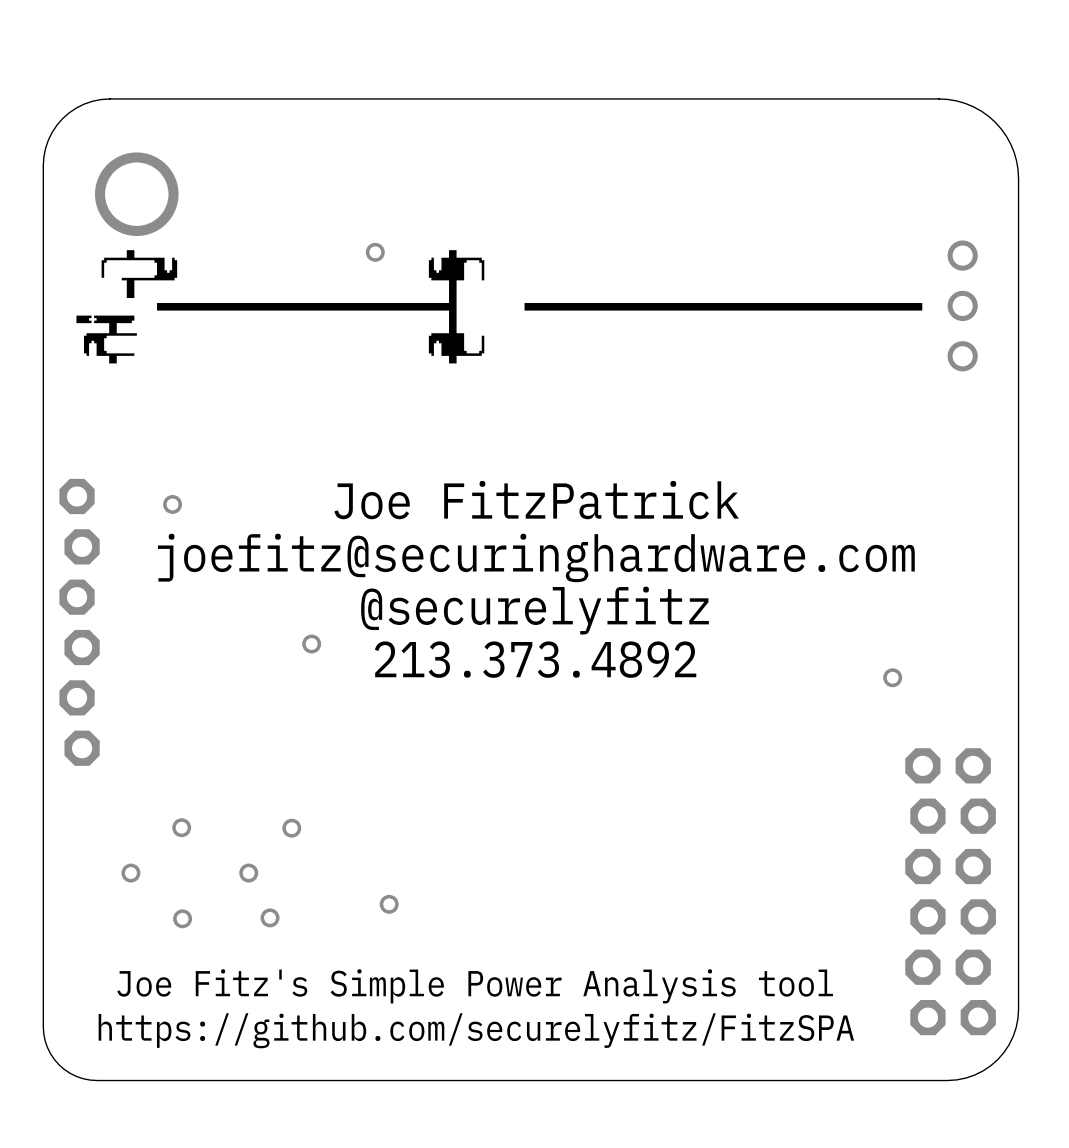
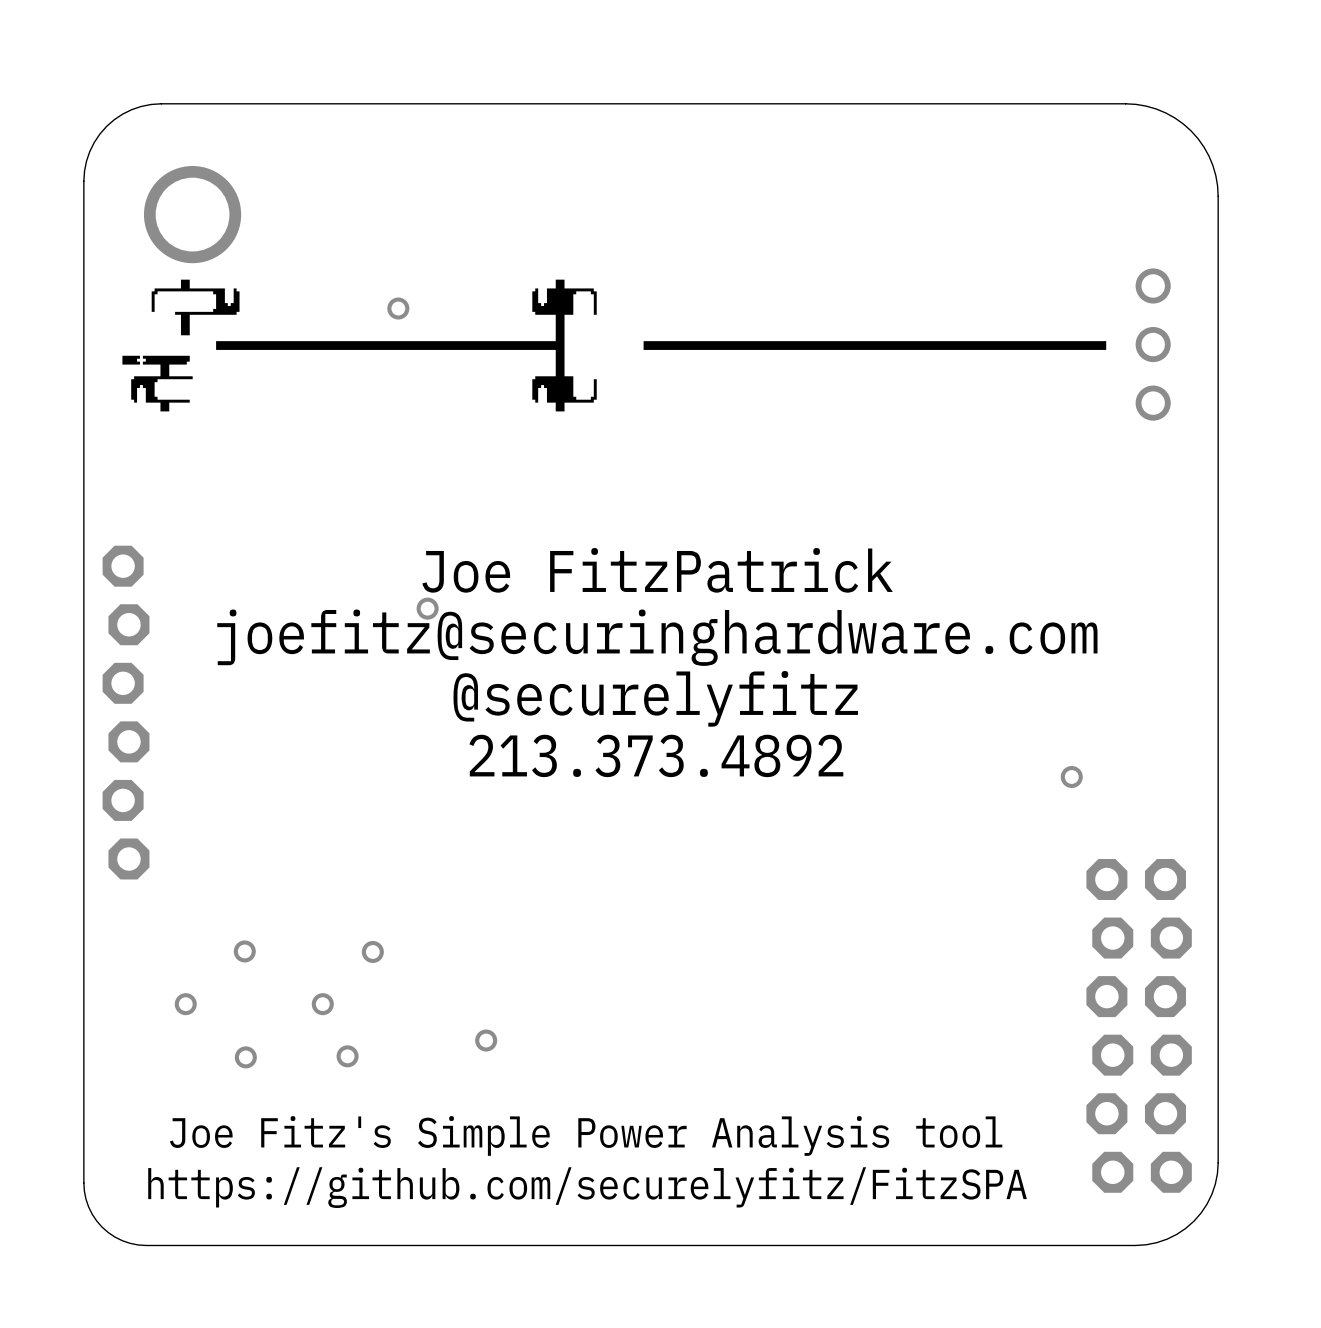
via position: (375, 252) -> (398, 308)
via: (172, 504) -> none
via: none -> (427, 608)
via: (311, 644) -> none

